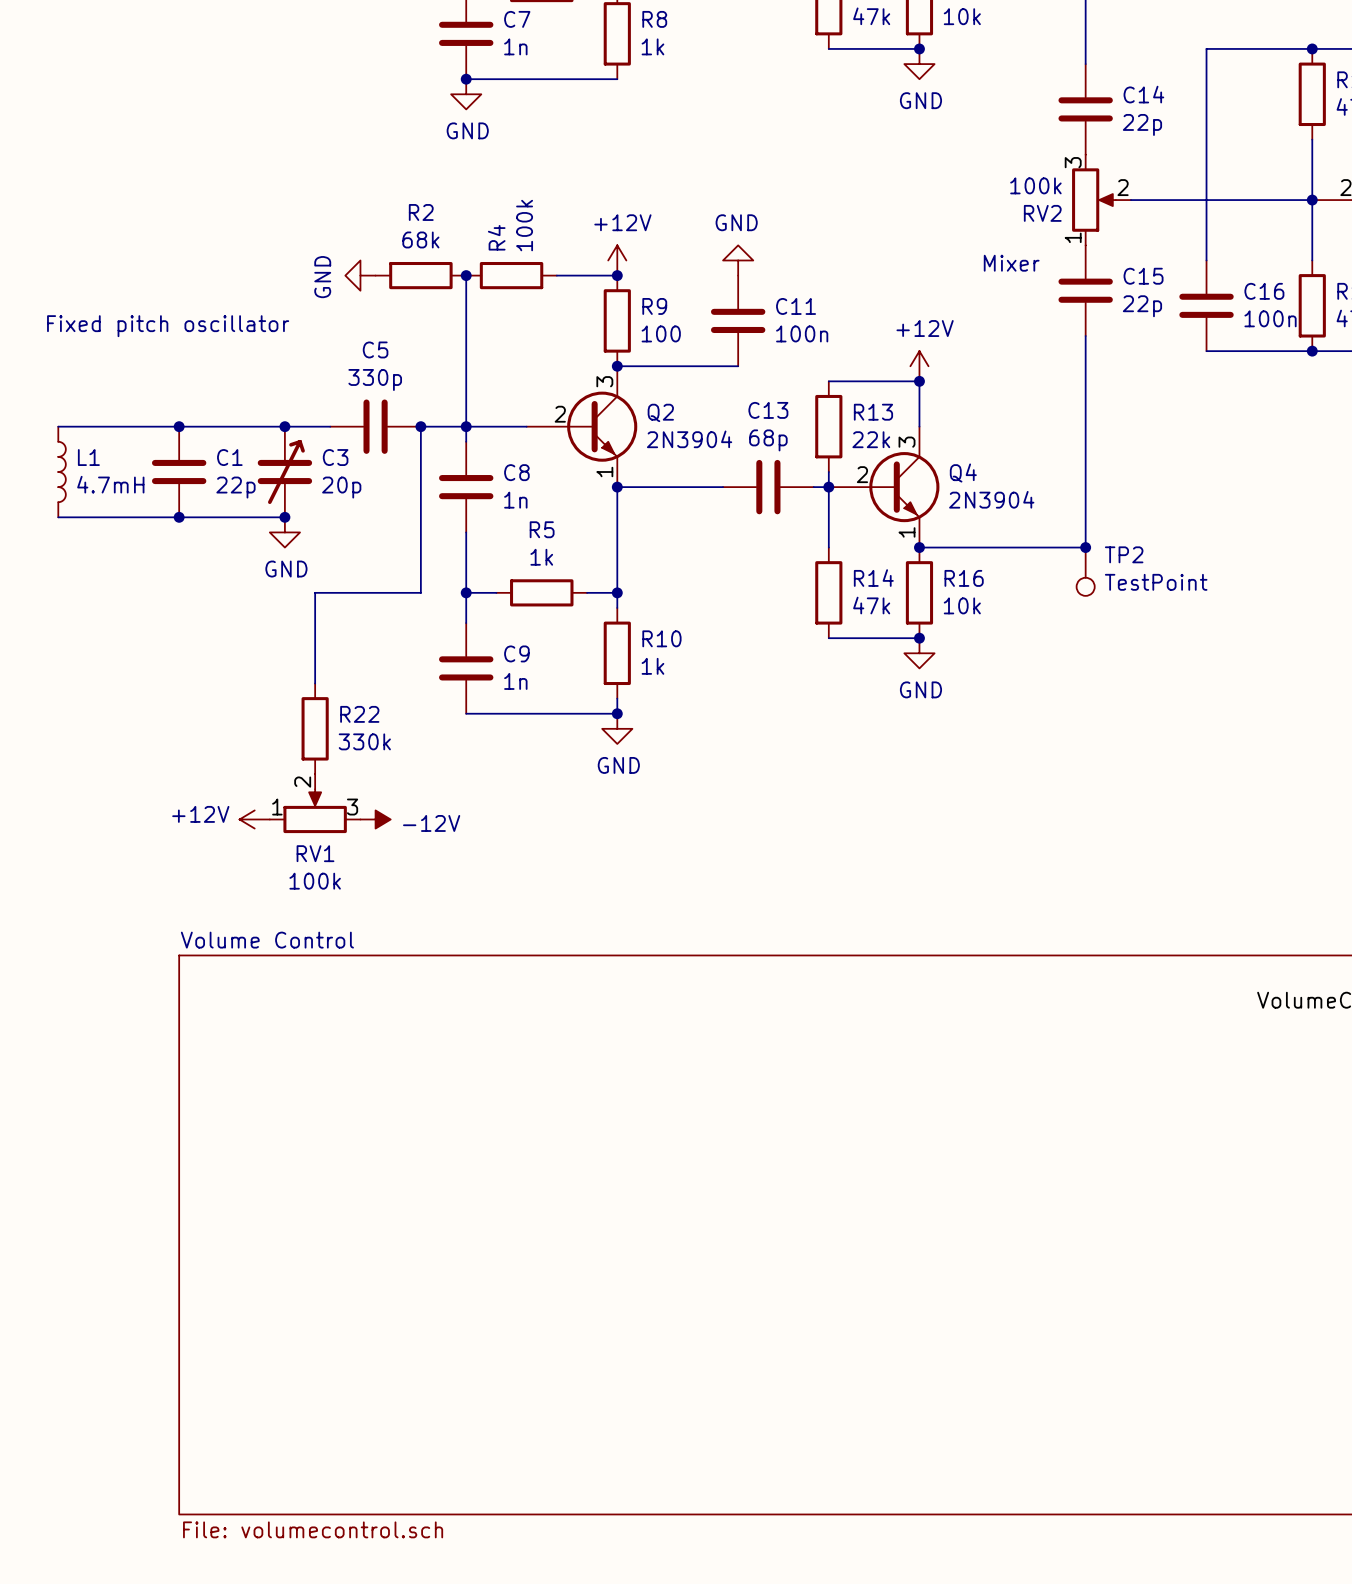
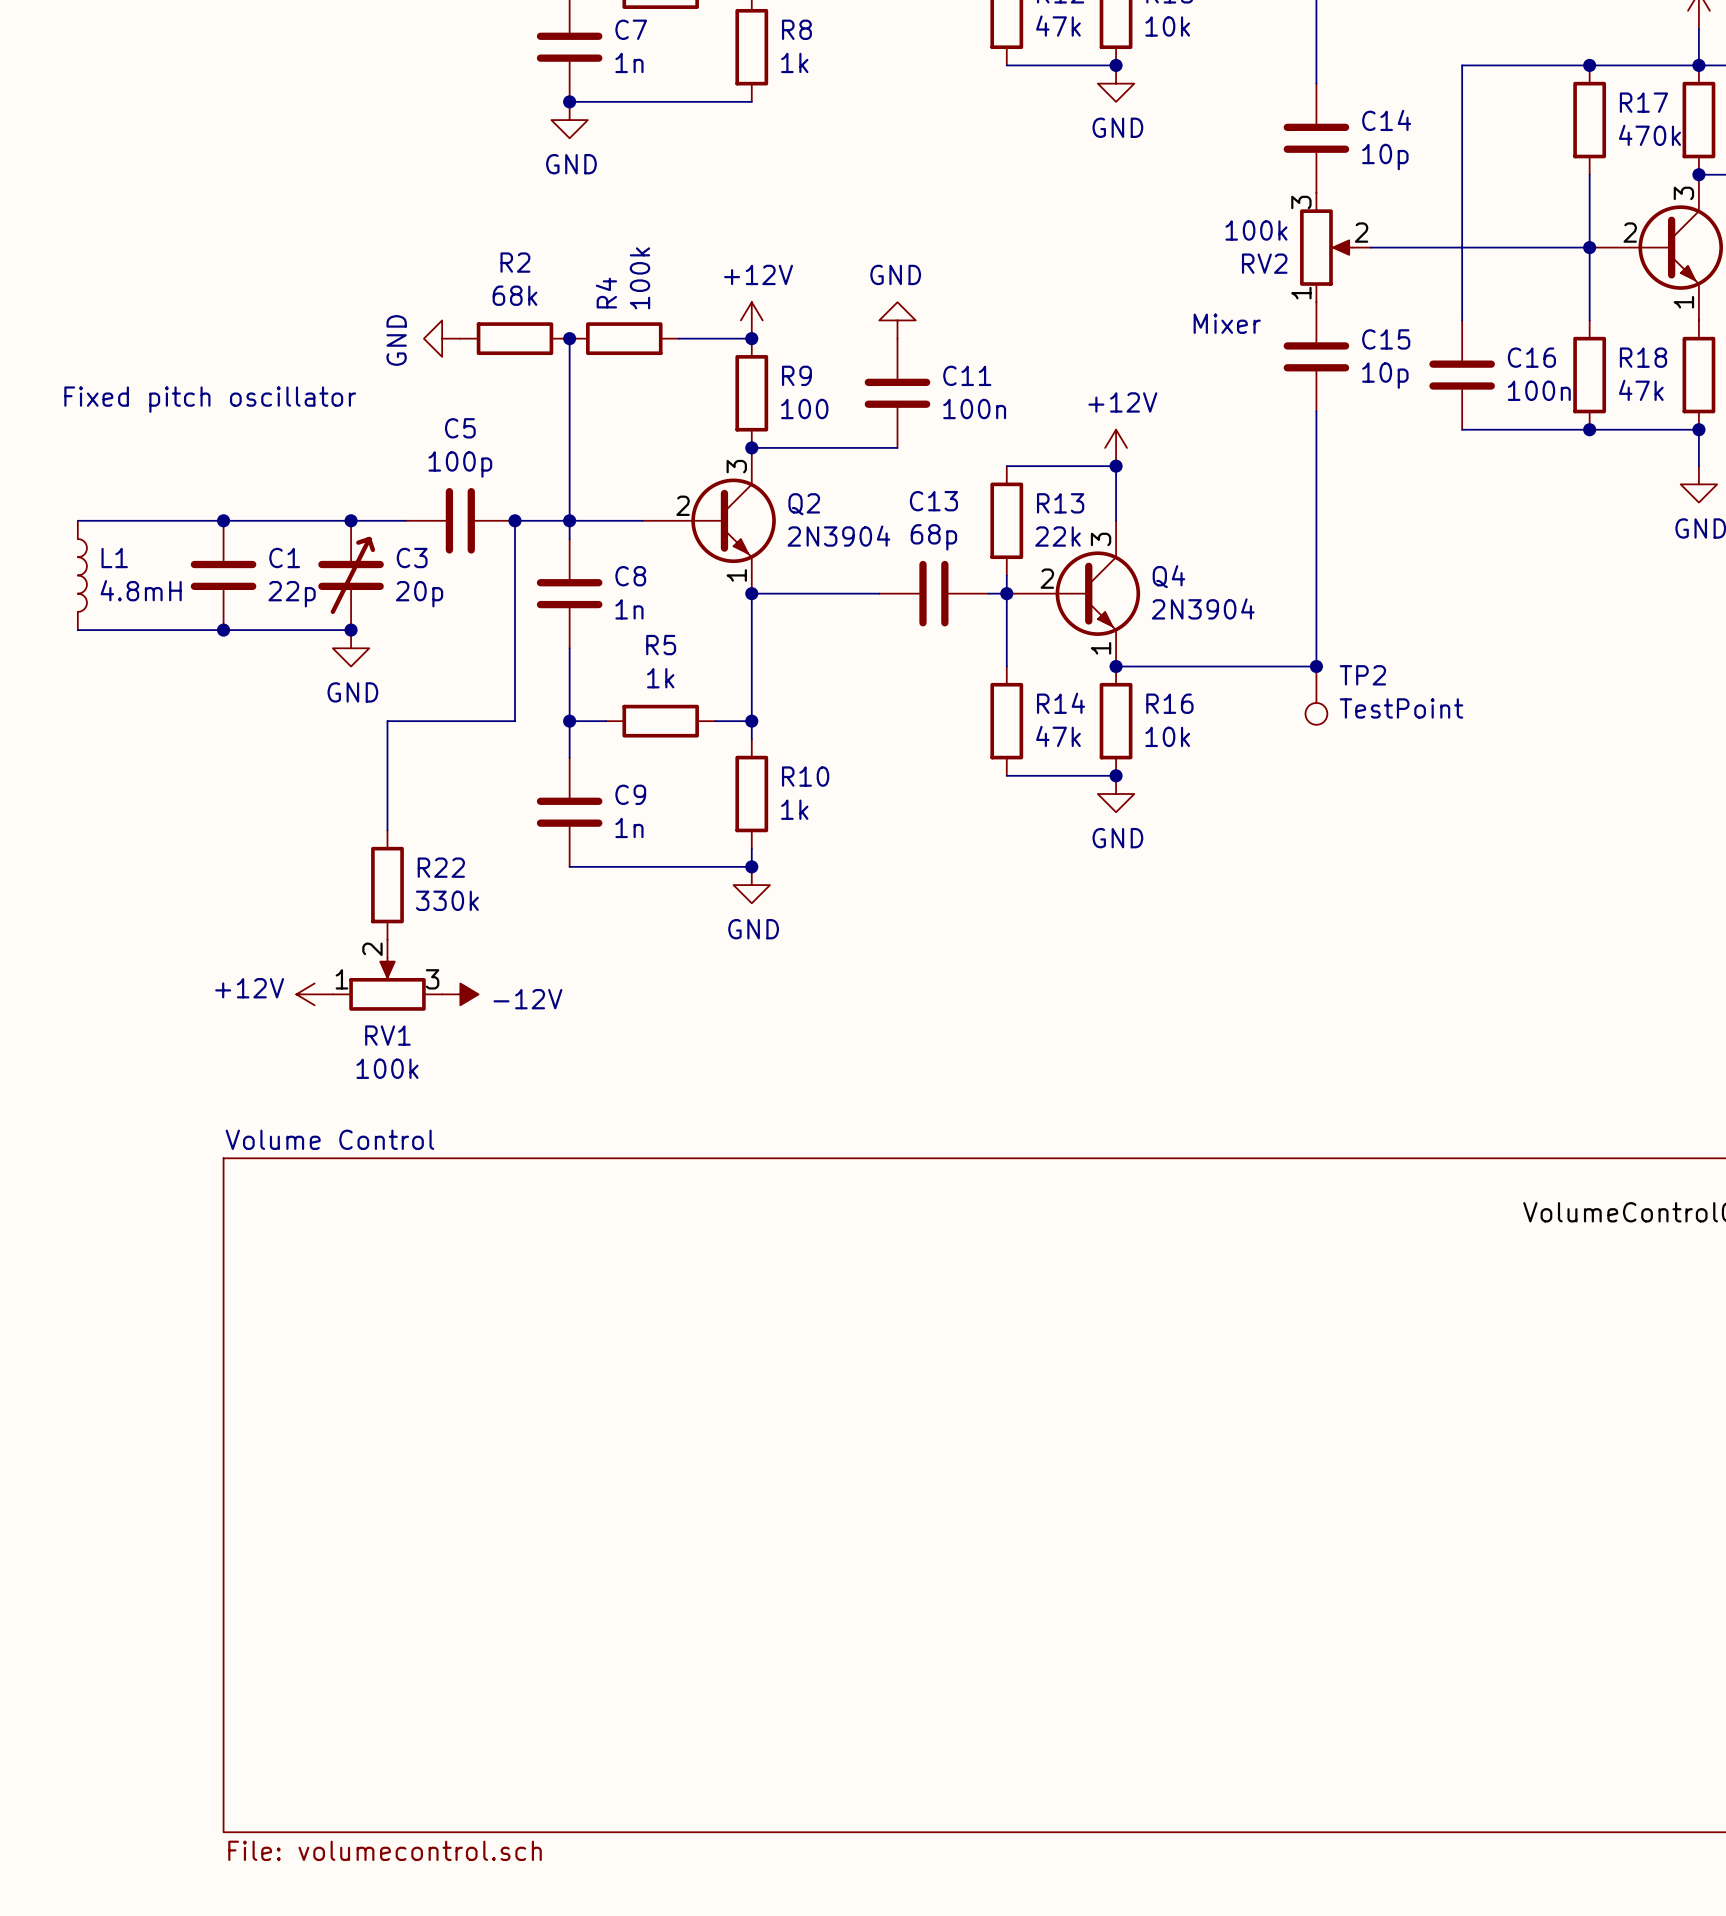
C14 value: 22p (1142, 124) -> 10p (1385, 157)
C15 value: 22p (1142, 306) -> 10p (1385, 375)
C5 value: 330p (375, 379) -> 100p (460, 464)
L1 value: 4.7mH (110, 484) -> 4.8mH (141, 590)

